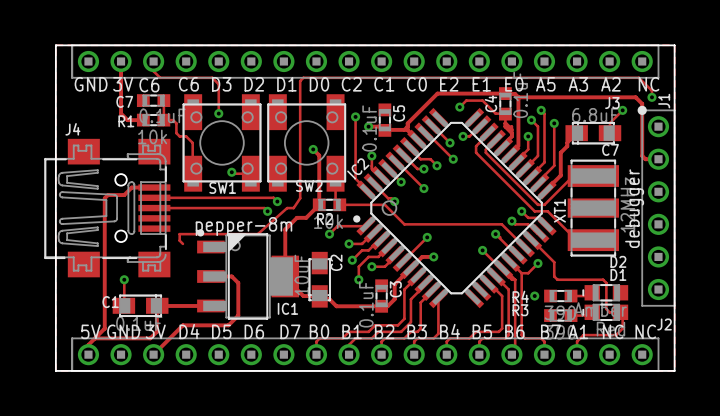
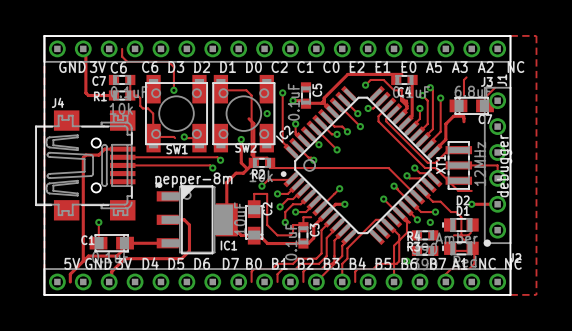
board edge: (642, 45) (674, 45) (674, 370) (642, 370) -> (510, 36) (510, 294)
track: (121, 61) (121, 113) (127, 120) -> (83, 48) (85, 51) (85, 92) (88, 95) (101, 95)
J3 position: (365, 61) -> (277, 48)
track: (505, 94) (515, 94) (518, 97) (635, 97) (642, 103) (642, 155) (645, 159) (658, 159) -> none
track: none -> (466, 77) (463, 79) (463, 95)
track: (651, 97) (651, 90) (638, 77) (303, 77) (300, 81) (300, 198) (293, 208) (287, 208) (257, 234) (179, 234) (179, 240) (182, 243) -> none
via: (651, 97) -> none
C4 rotation: 0° (505, 103) -> 90° clockwise (404, 79)
via: (622, 110) -> none
drawing position: (642, 110) -> (487, 243)
track: (576, 133) (567, 142) (567, 146) (560, 152) (560, 155) -> (463, 121) (463, 116) (453, 116) (445, 124)
via: none -> (267, 113)
via: (313, 149) -> none
XT1 footprint: [567, 159, 620, 257] -> [445, 141, 473, 190]
track: none -> (153, 138) (175, 138)
track: (335, 173) (335, 200) (339, 204) (384, 204) (404, 224) (501, 224) -> (220, 89) (246, 90) (251, 95) (251, 155) (254, 157) (267, 157) (270, 160) (270, 168) (388, 168) (398, 178)
track: none -> (241, 139) (241, 162) (246, 168)
via: none -> (241, 139)
track: (593, 176) (573, 176) (544, 204) -> (458, 150) (448, 149) (435, 162) (432, 162)
track: none -> (458, 165) (497, 165) (497, 178)
J1 position: (658, 208) -> (497, 165)
track: (532, 240) (554, 262) (554, 276) (557, 279) (603, 279) (606, 283) (606, 309) (609, 312) (620, 312) -> (423, 191) (432, 201) (440, 201) (451, 212) (456, 212) (461, 217) (461, 237) (474, 250) (474, 263) (469, 269) (451, 269) (445, 274) (445, 281)
track: none -> (412, 202) (421, 212) (435, 212)
track: none -> (471, 204) (497, 204)
via: none -> (471, 204)
track: none -> (254, 209) (254, 193) (267, 193) (267, 225) (277, 235) (290, 235) (293, 232) (293, 225) (300, 225) (303, 227) (303, 217) (311, 217)
track: (537, 263) (528, 273) (521, 273) (521, 335) (524, 338) (541, 338) (544, 341) (544, 354) -> none
via: (537, 263) -> none
via: none -> (435, 212)
track: none -> (400, 214) (407, 220) (407, 232) (394, 245) (394, 281)
via: none -> (417, 219)
track: (496, 277) (508, 289) (508, 335) (505, 338) (482, 338) (479, 341) (479, 354) -> none
track: (515, 279) (515, 351) (511, 354) -> none
via: none -> (430, 222)
track: none -> (388, 225) (383, 219) (375, 219) (347, 248) (347, 258) (342, 263) (342, 281)
D2 footprint: [582, 284, 629, 302] -> [442, 218, 479, 232]
via: (534, 296) -> none
R4 position: (560, 296) -> (425, 235)
track: (438, 301) (438, 333) (433, 338) (417, 338) (414, 341) (414, 354) -> (348, 239) (342, 245) (342, 256) (316, 281)
D1 footprint: [582, 303, 629, 321] -> [442, 241, 479, 256]
track: none -> (125, 243) (122, 246) (122, 250) (116, 256) (88, 256) (83, 261)
track: (156, 309) (156, 331) (150, 338) (94, 338) -> none
track: (612, 312) (615, 314) (622, 314) (622, 328) (616, 335) (583, 335) (577, 341) (577, 354) -> none
R3 position: (560, 315) -> (425, 250)
track: (182, 325) (153, 354) -> (145, 258) (124, 258) (111, 271) (111, 279) (109, 281)
via: none -> (407, 261)
J2 position: (365, 354) -> (277, 281)

